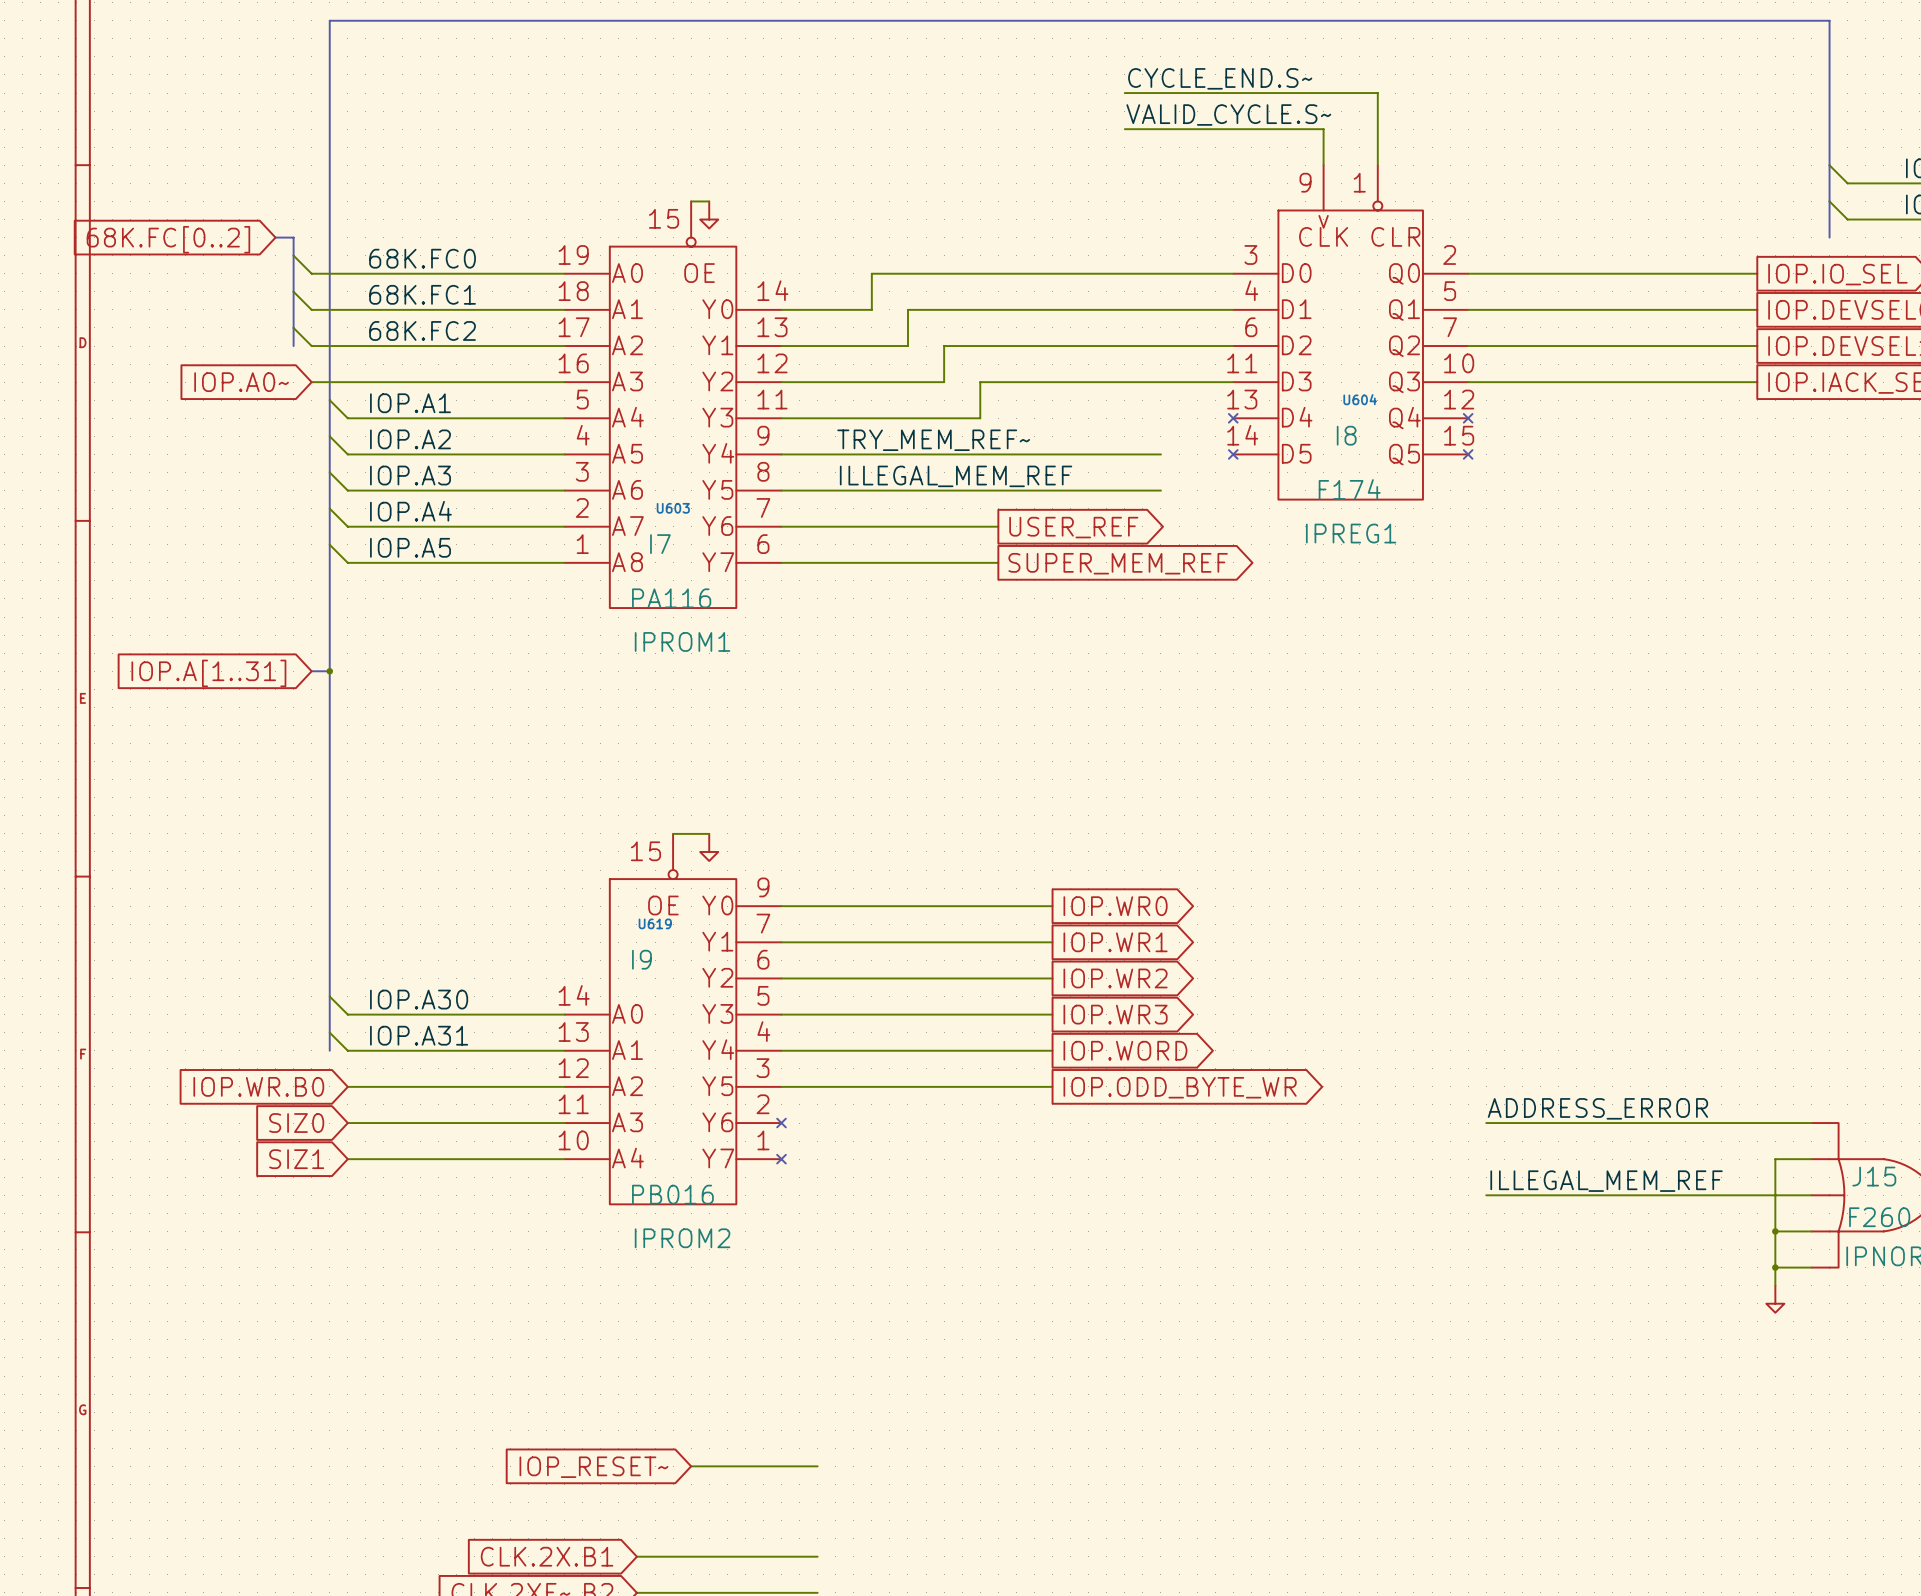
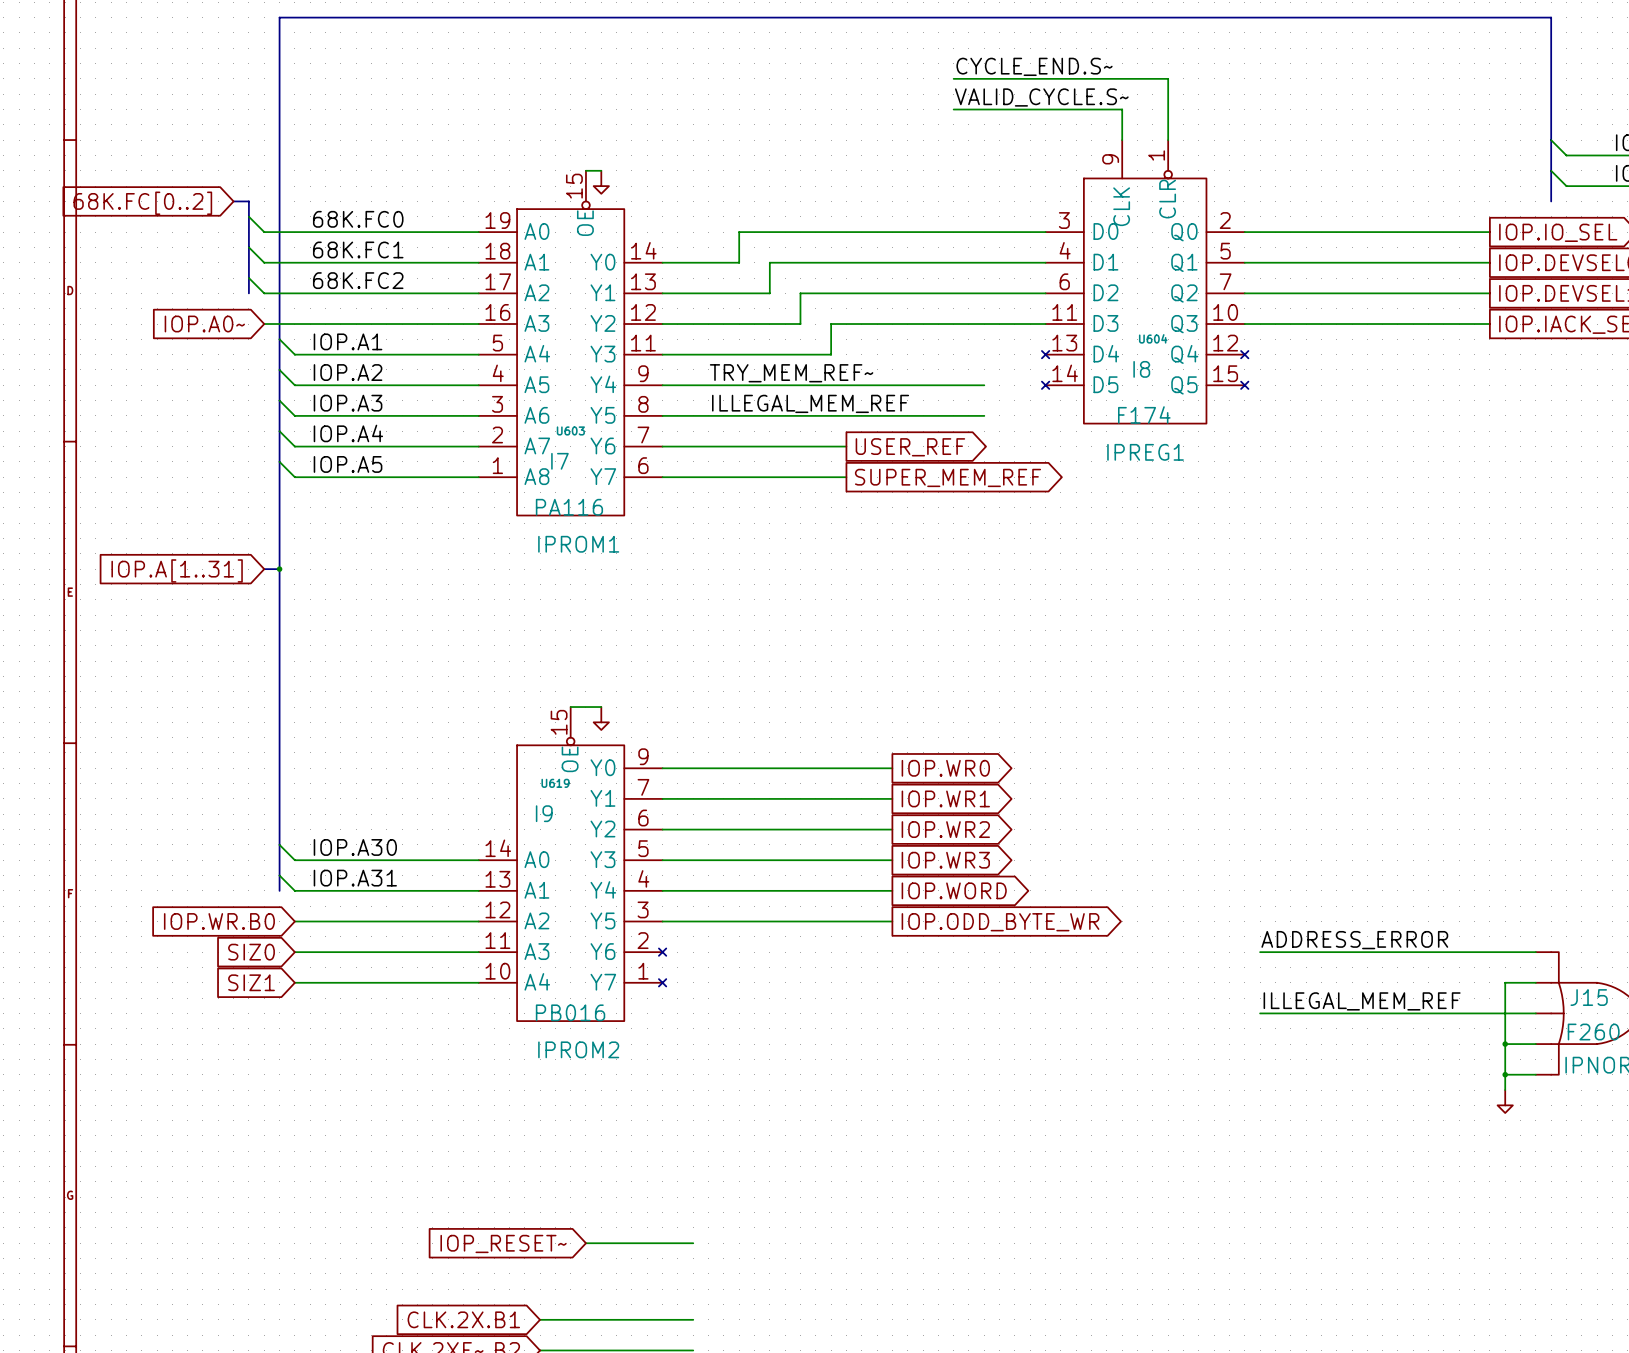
U604 symbol: [1233, 165, 1469, 500] -> [1045, 140, 1245, 424]
U603 symbol: [564, 201, 782, 609] -> [478, 170, 663, 516]
U619 symbol: [564, 833, 782, 1205] -> [478, 707, 663, 1022]

